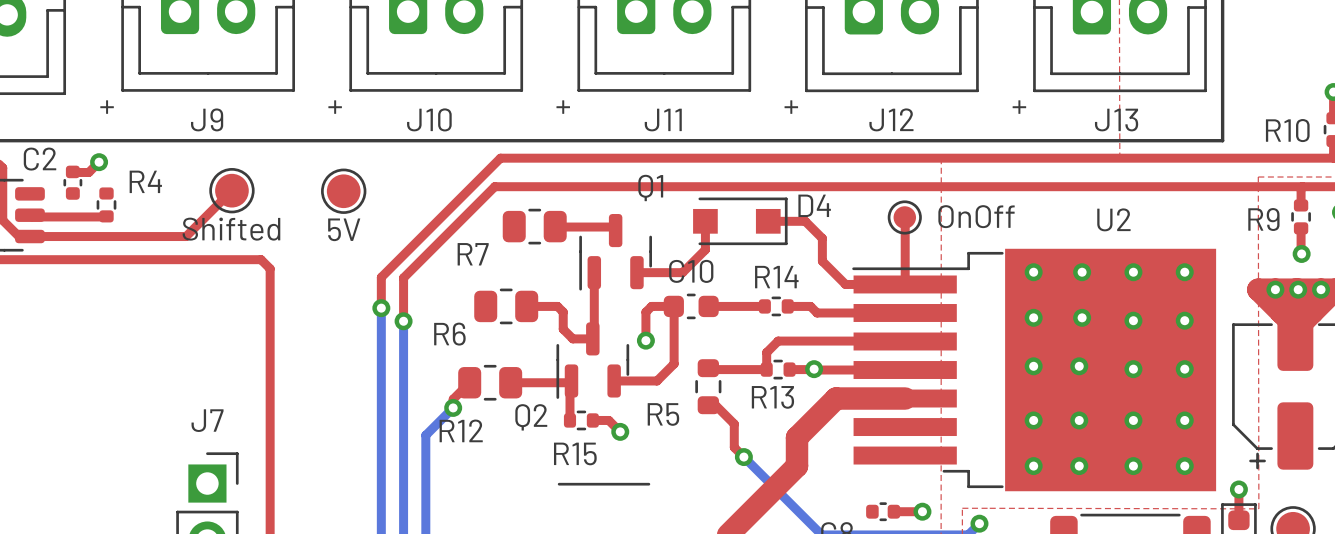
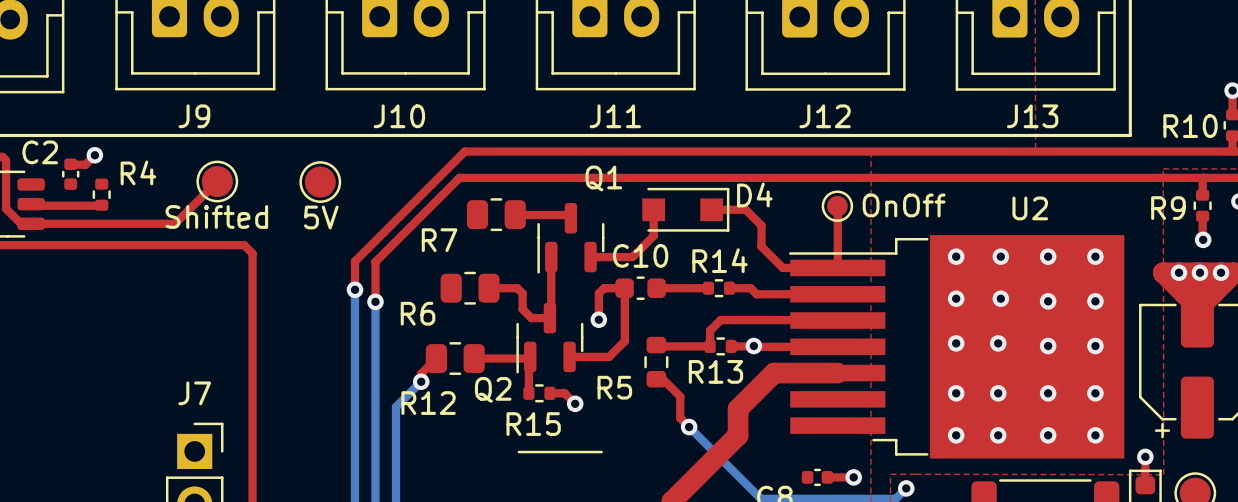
text: + (107, 107) -> none
text: + (335, 107) -> none
text: + (563, 107) -> none
text: + (791, 107) -> none
text: + (1019, 107) -> none

